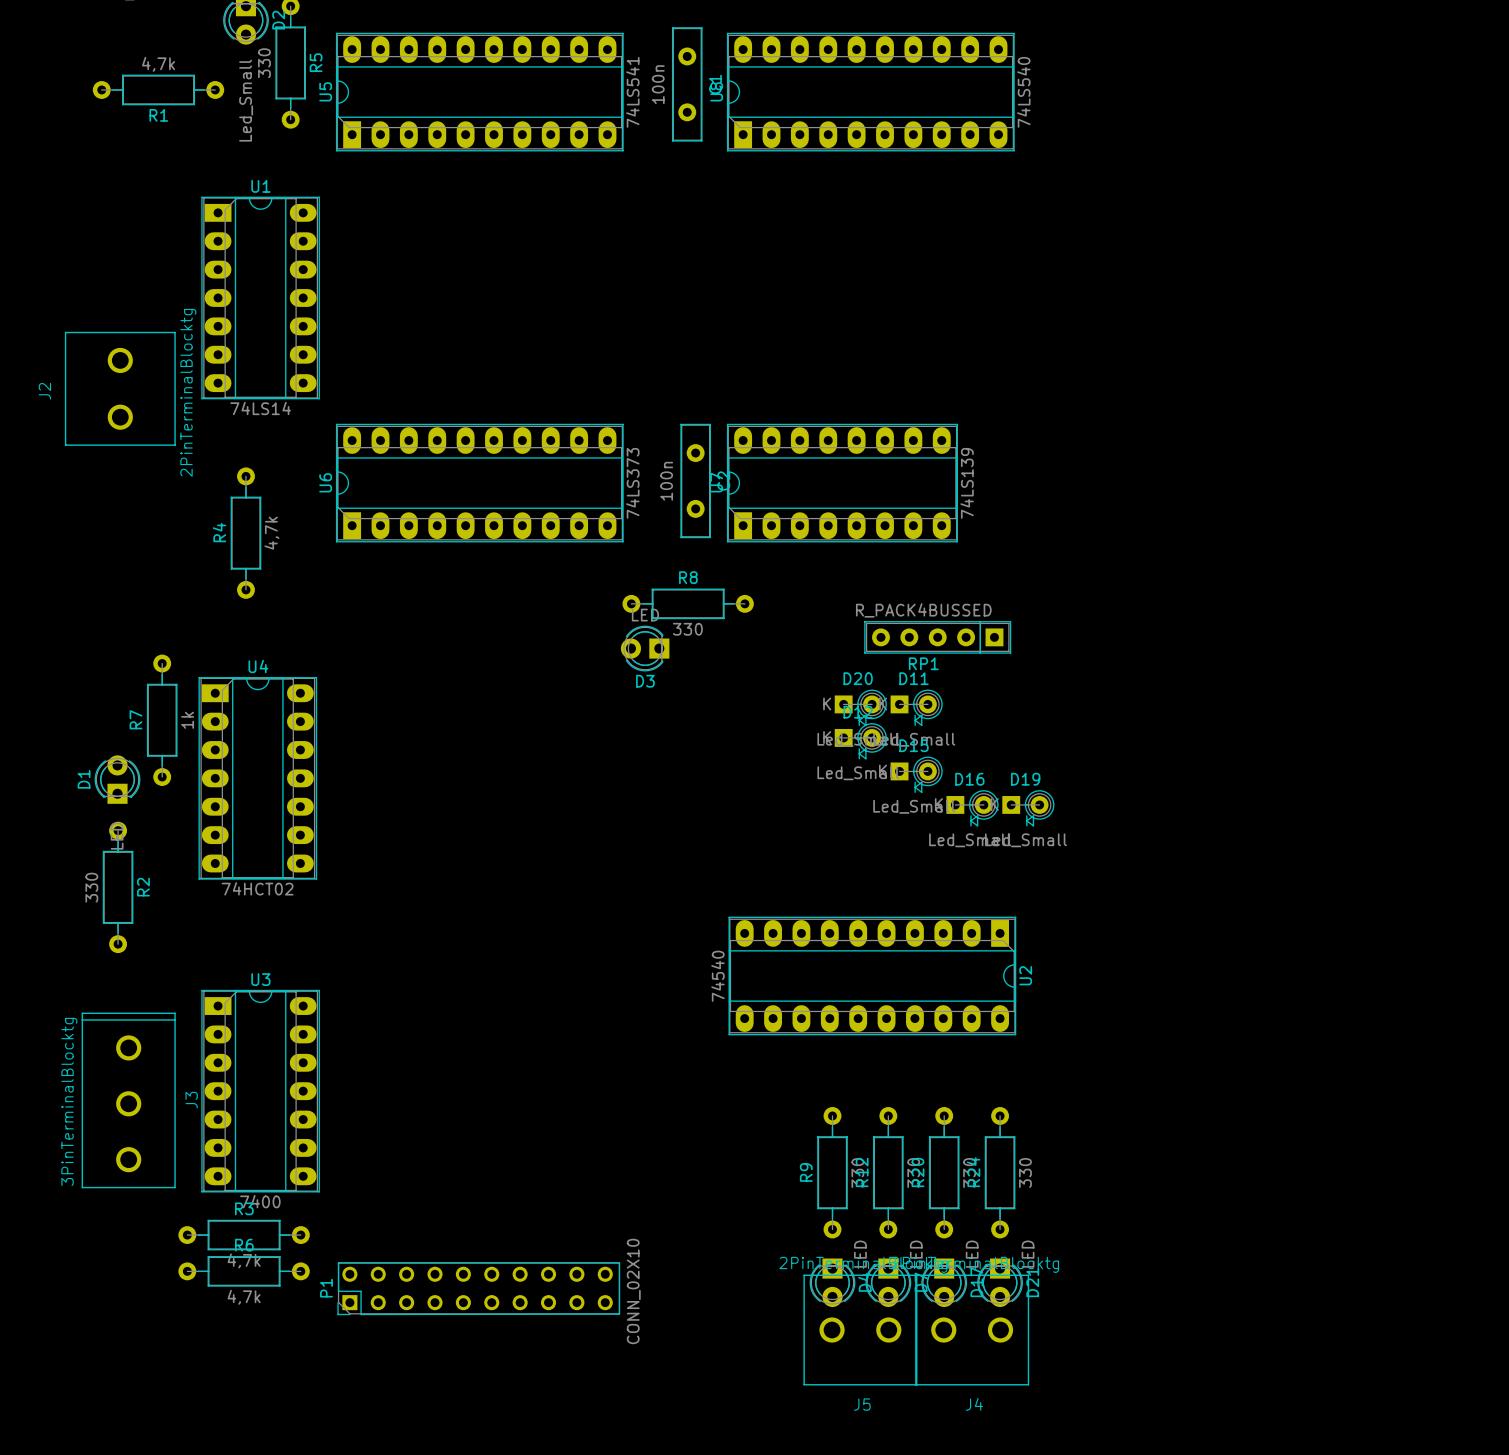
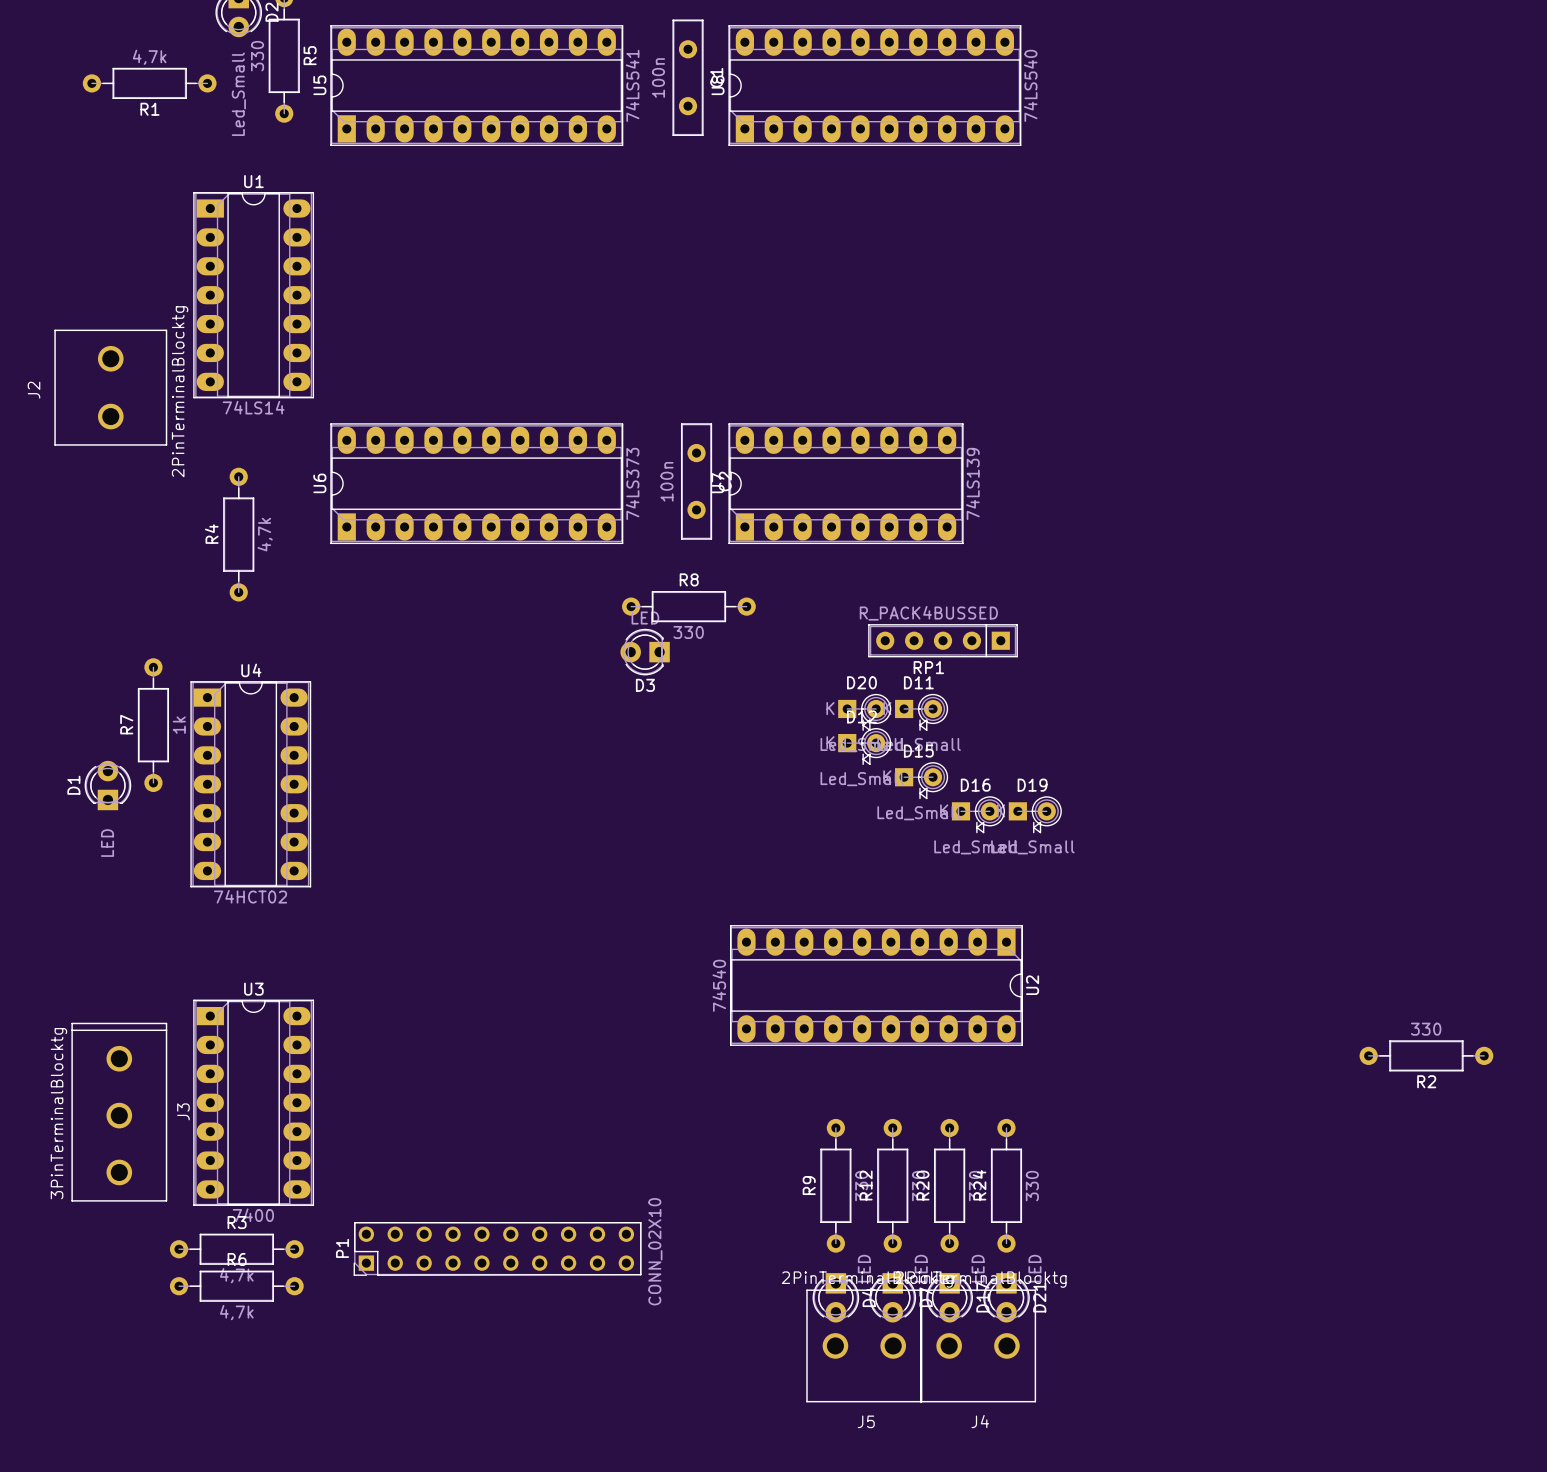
R2 rotation: 0° (118, 887) -> 90° clockwise (1426, 1055)
R2 position: (118, 887) -> (1426, 1055)
P1 position: (478, 1288) -> (497, 1248)

